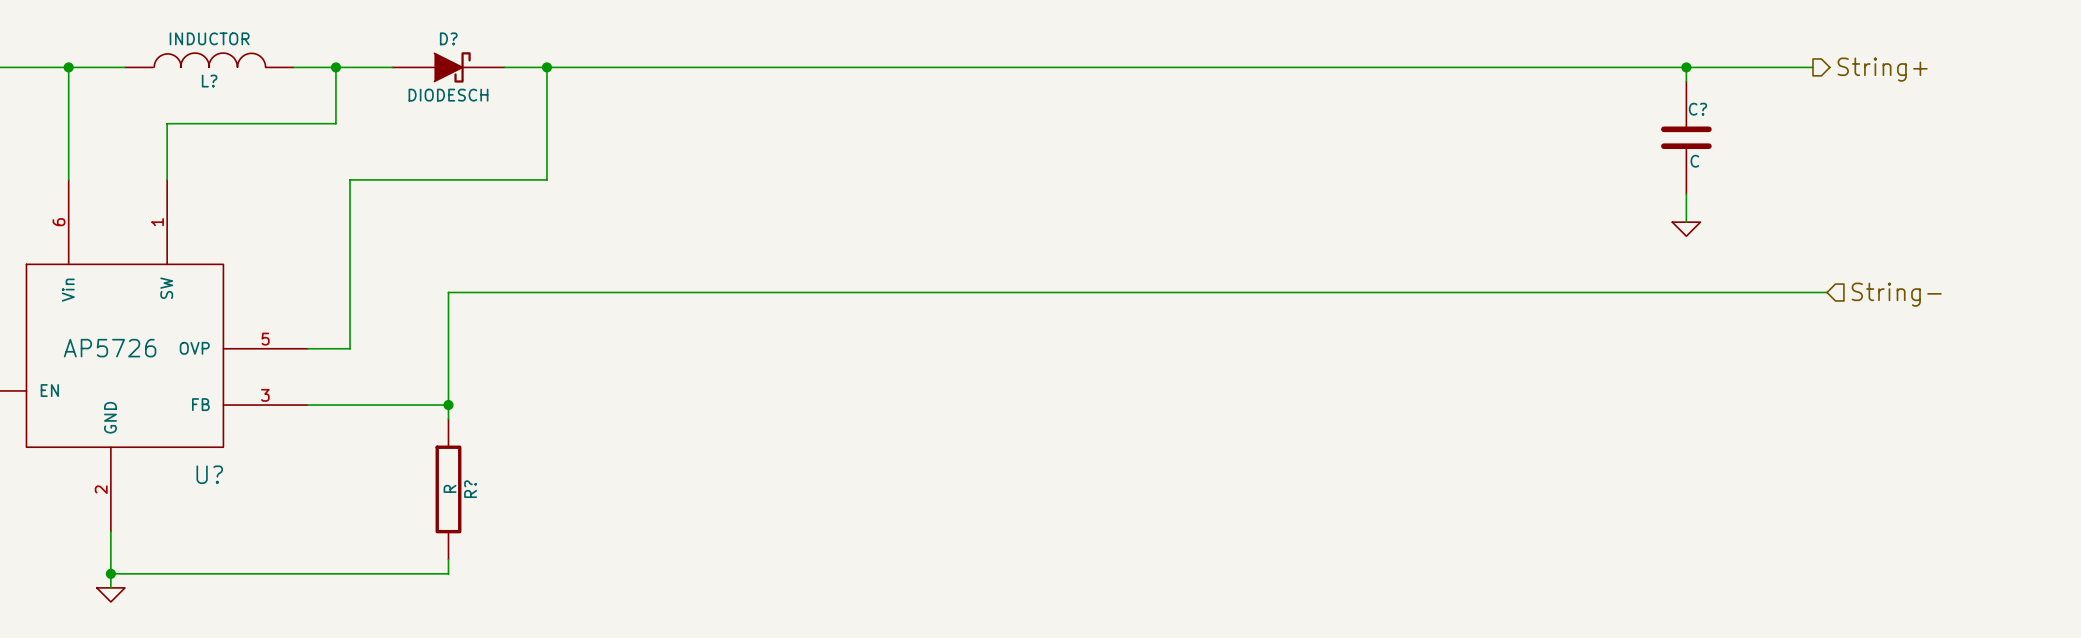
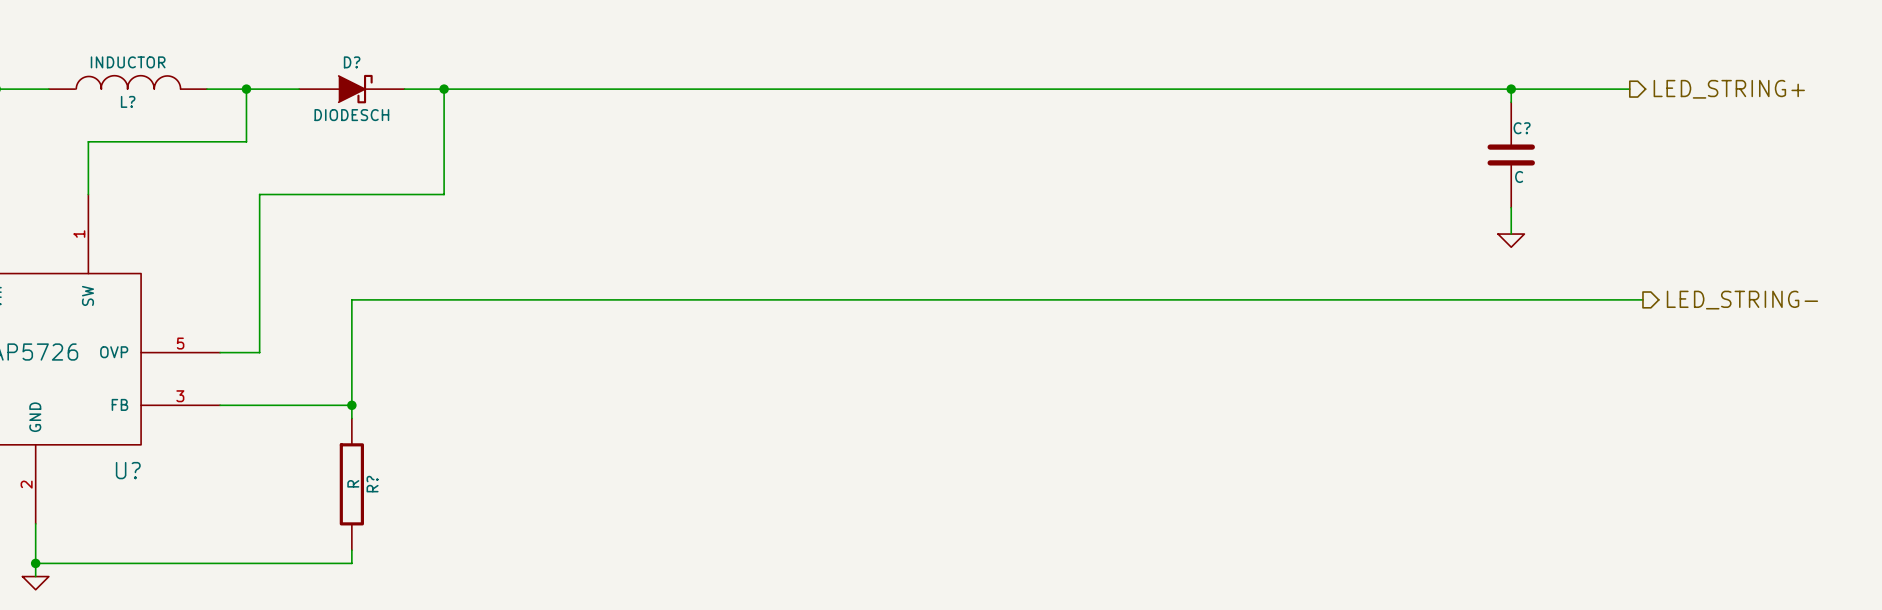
hierarchical label: String+ (1882, 69) -> LED_STRING+ (1729, 89)
hierarchical label shape: input (1896, 294) -> output (1742, 300)
hierarchical label: String- (1896, 294) -> LED_STRING- (1742, 300)

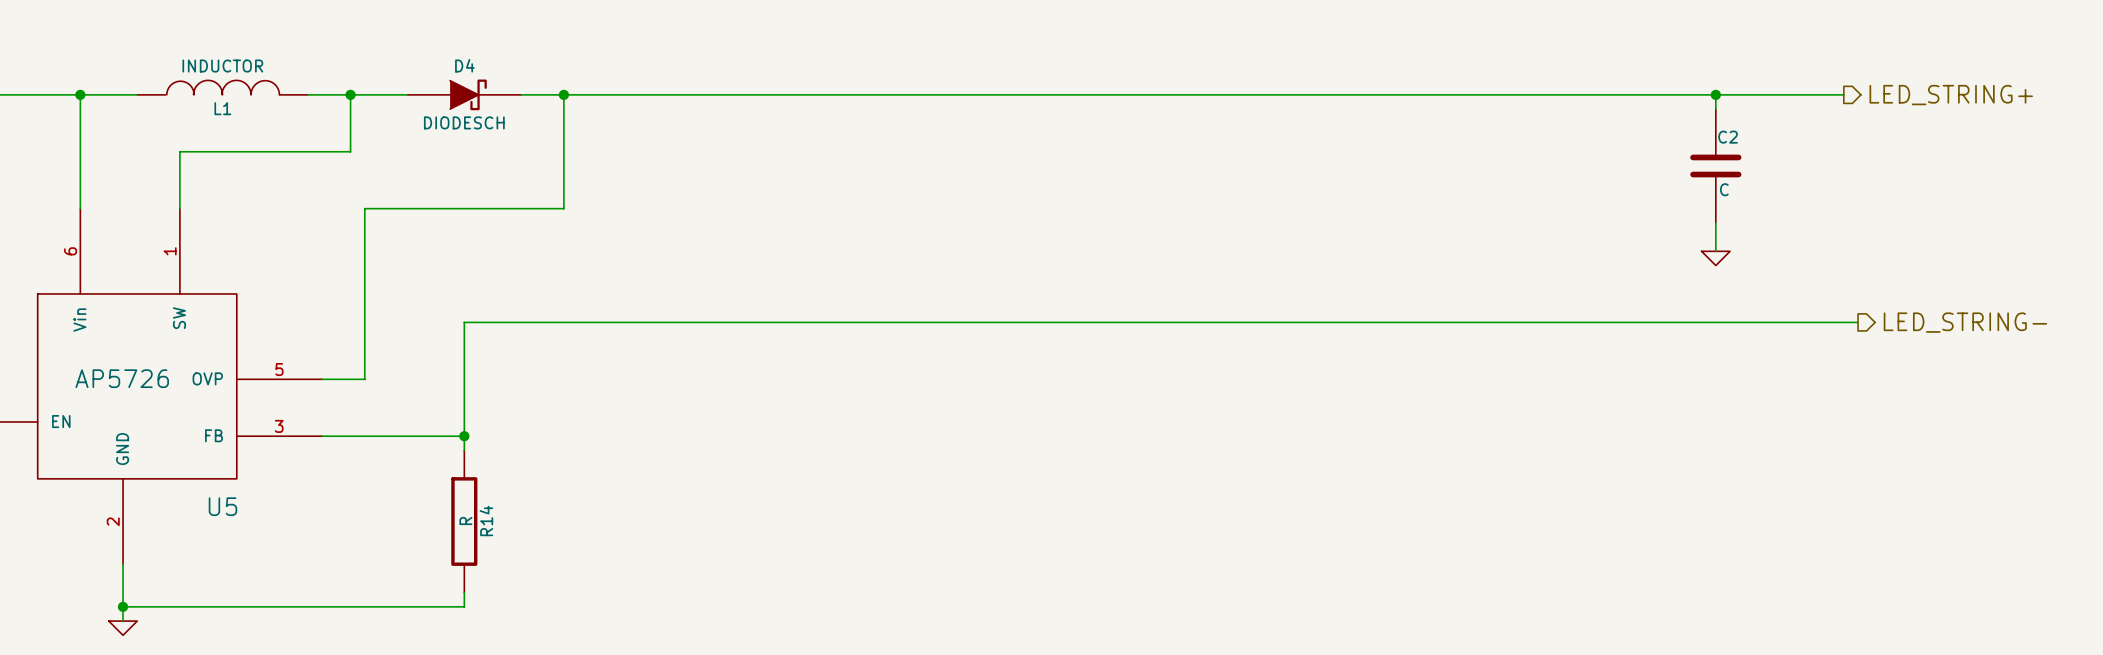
D? name: D? (352, 62) -> D4 (464, 65)
L? name: L? (128, 101) -> L1 (222, 108)
C? name: C? (1522, 128) -> C2 (1728, 137)
U? name: U? (128, 470) -> U5 (222, 506)
R? name: R? (372, 484) -> R14 (486, 520)

